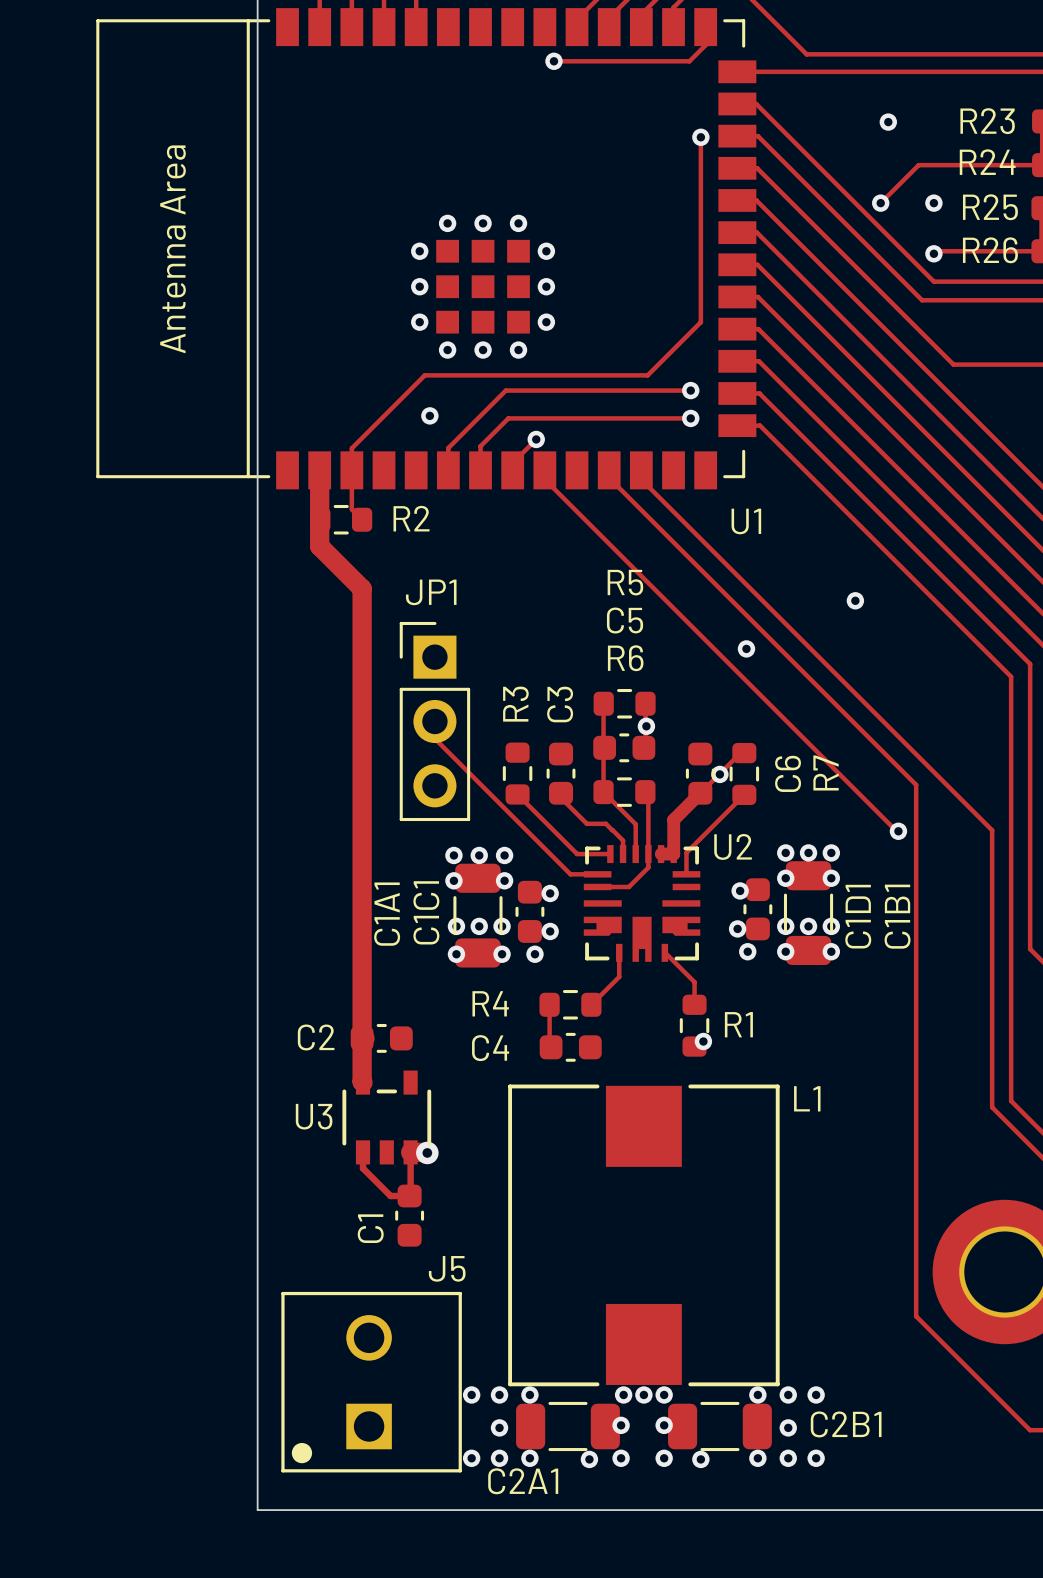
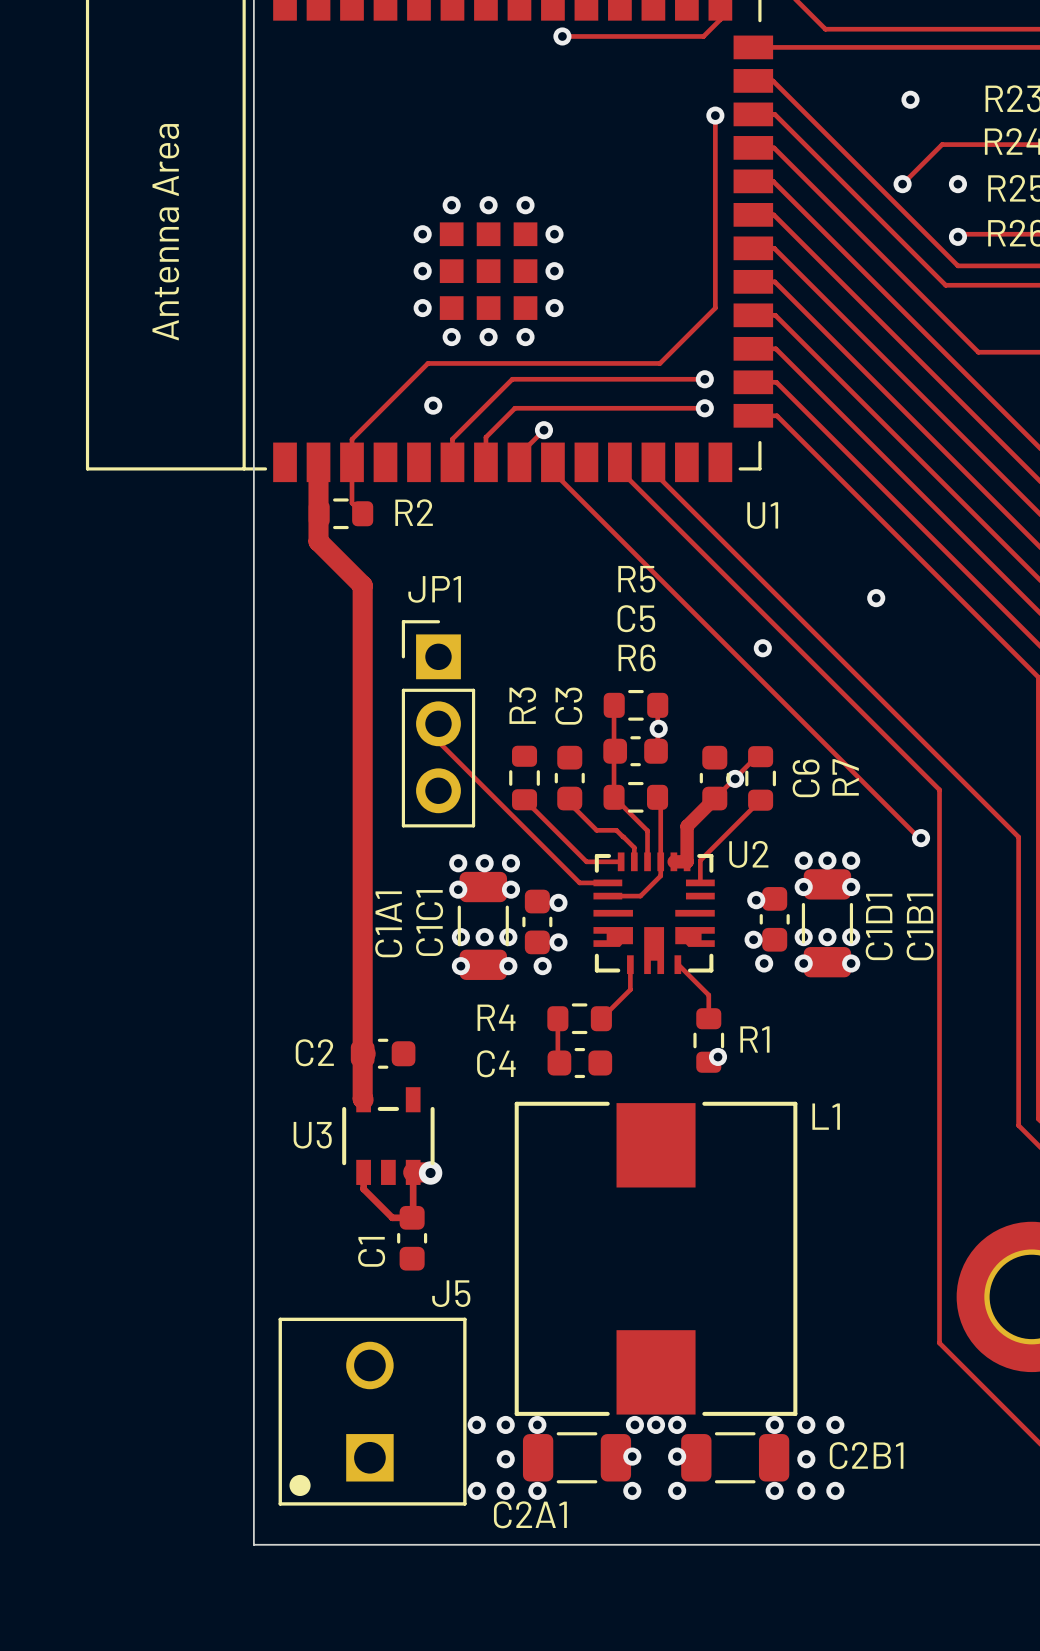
via: (589, 1459) -> none
via: (700, 1459) -> none

